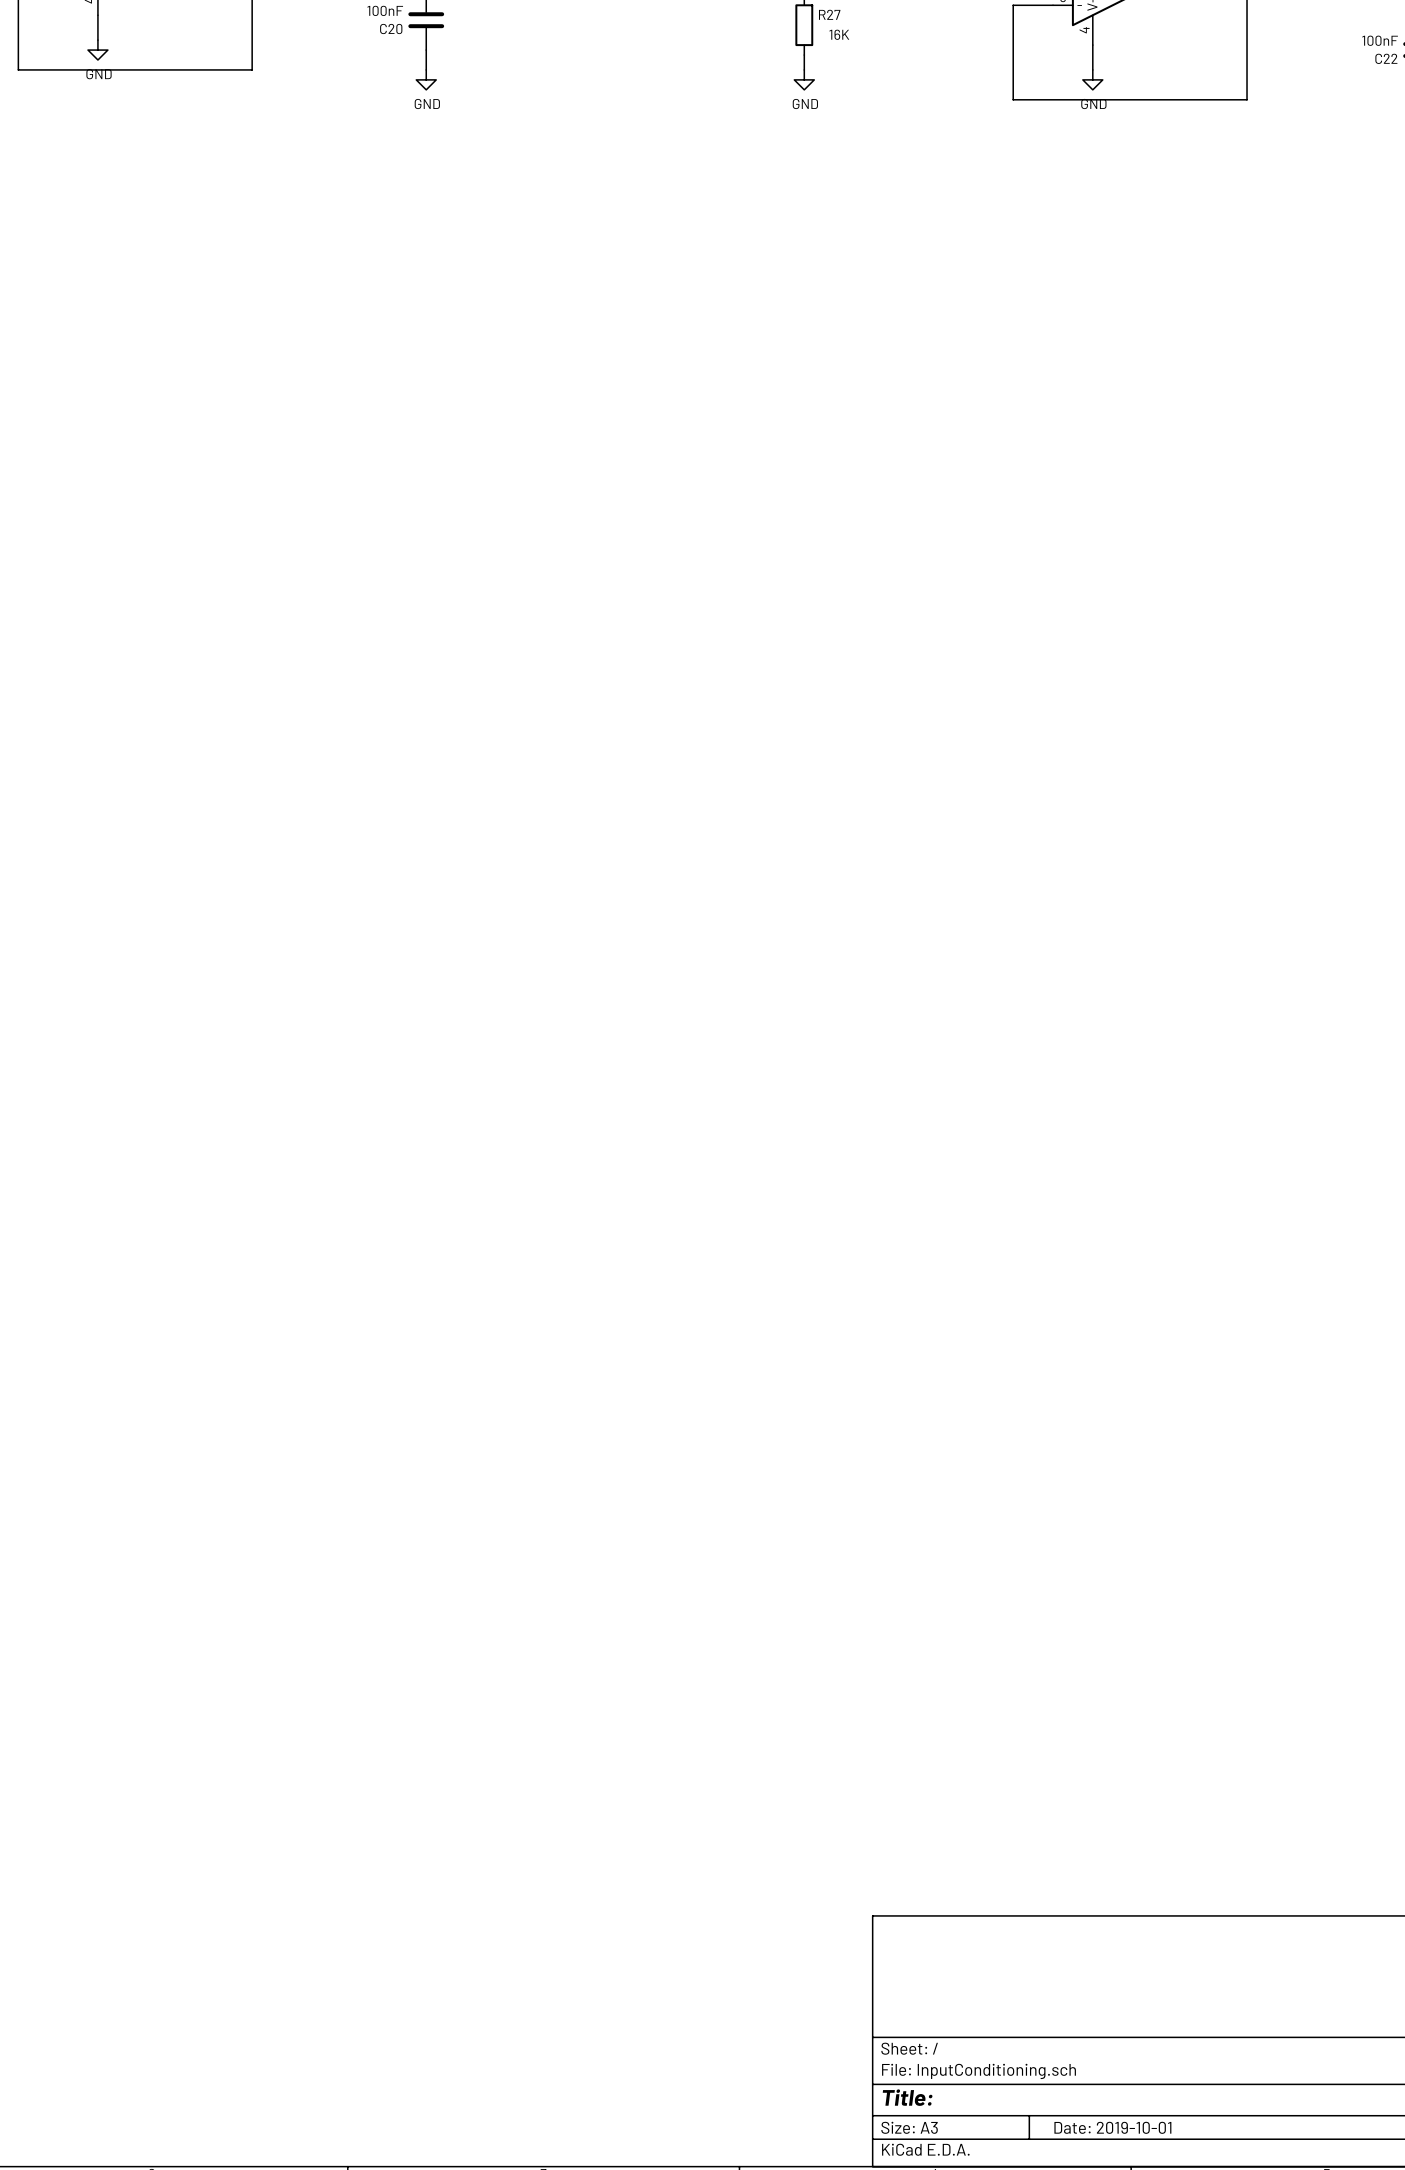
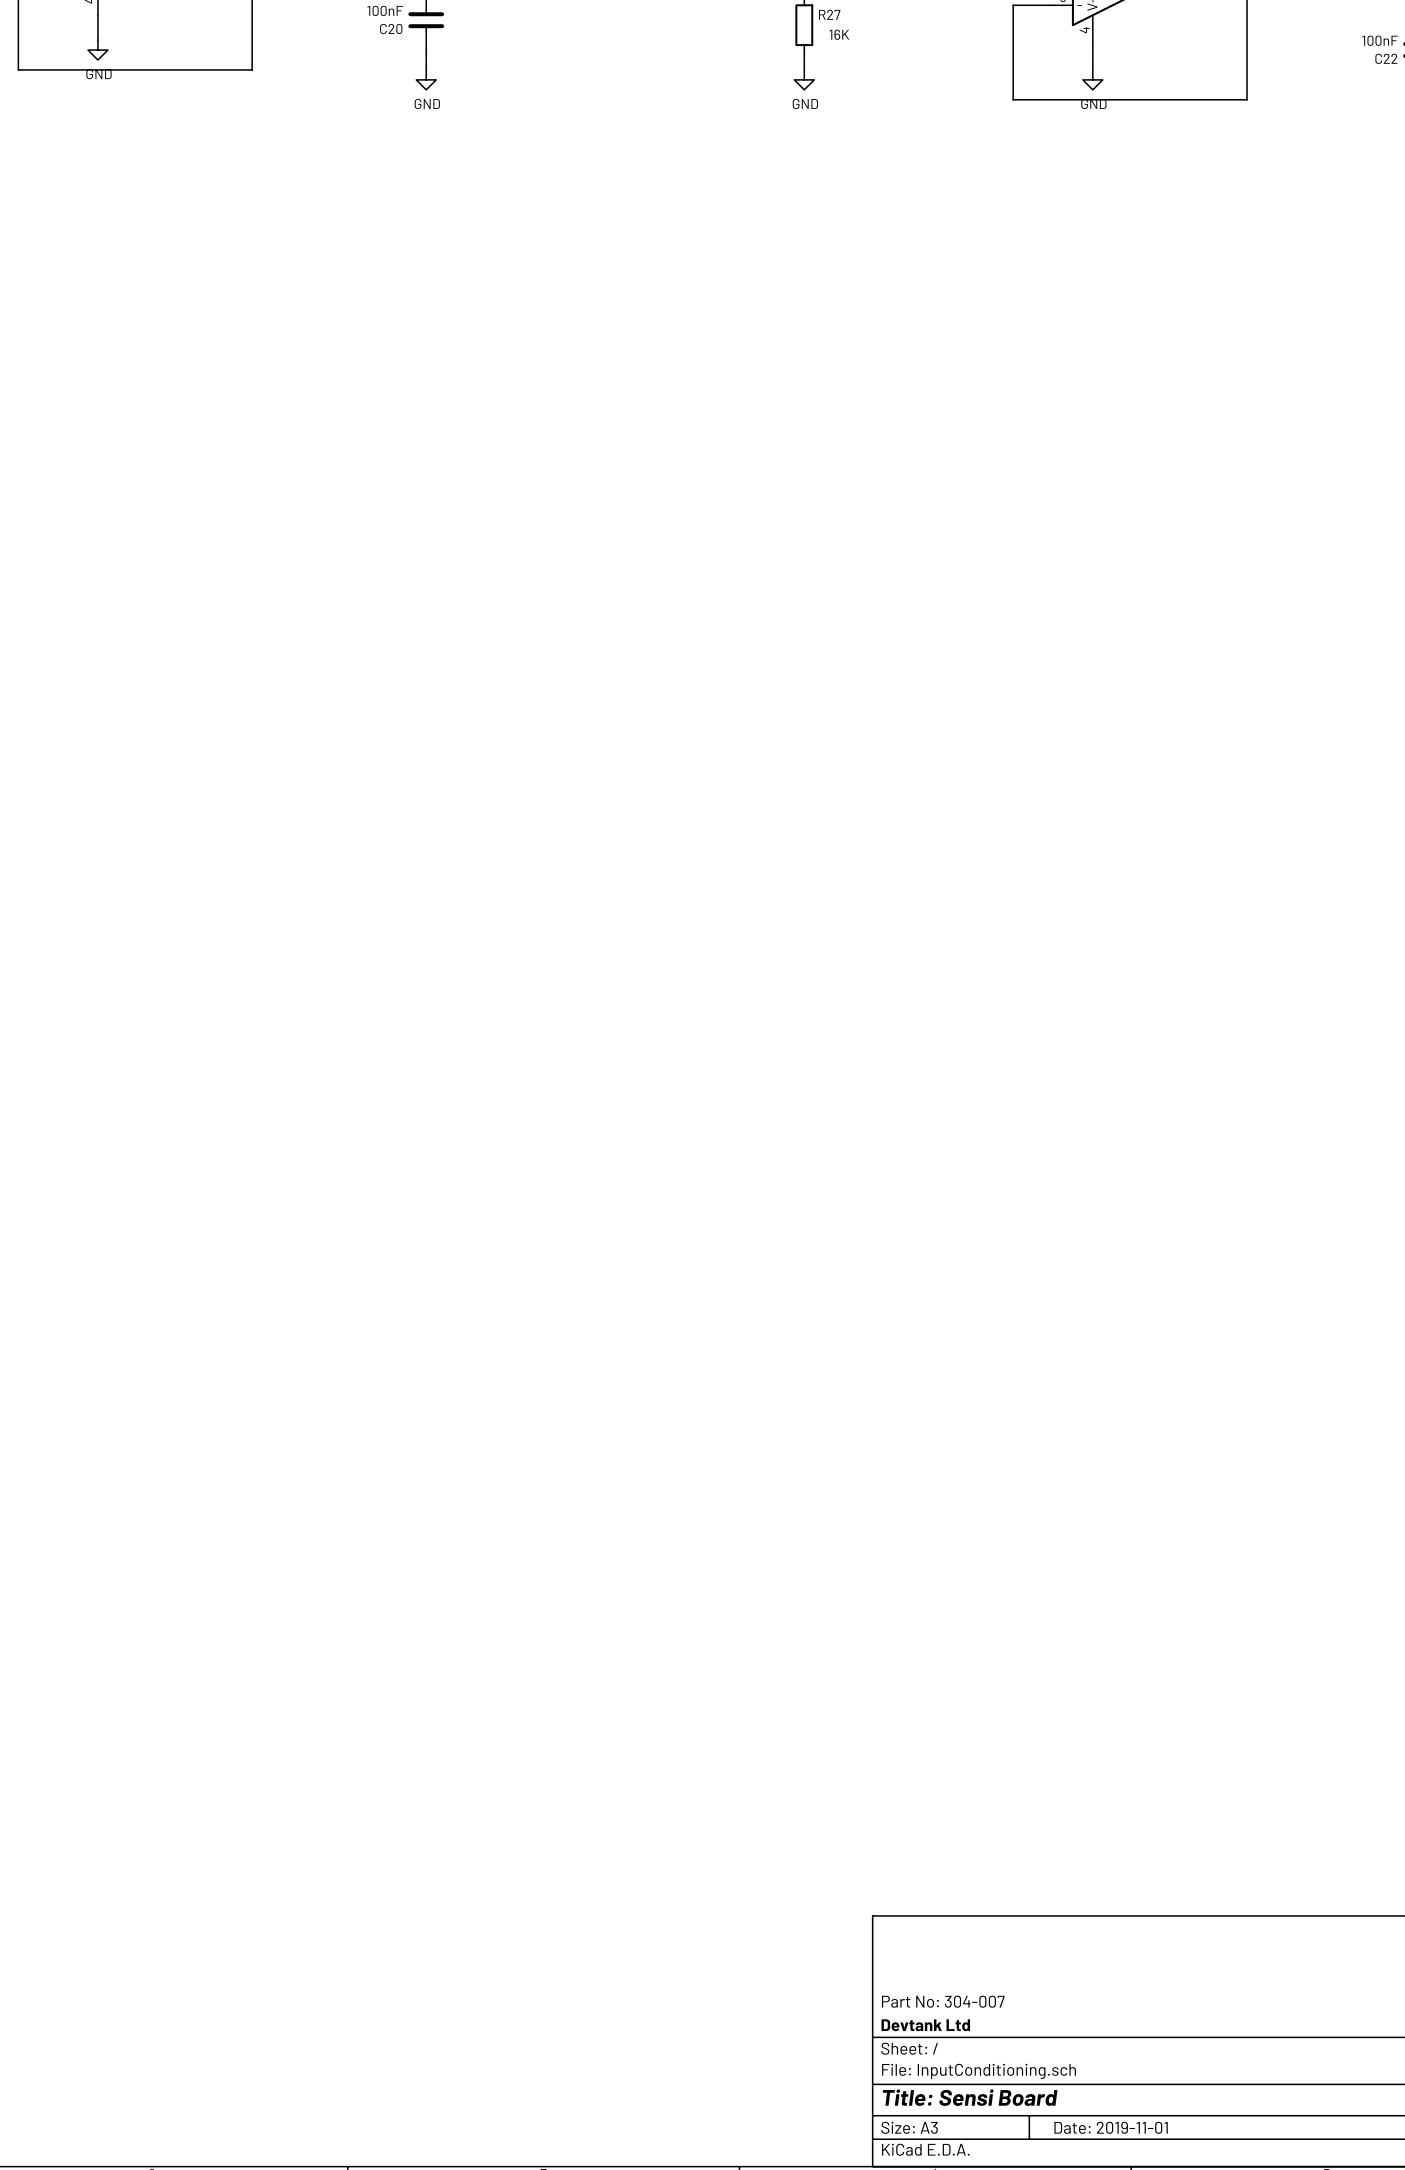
title block: none -> Part No: 304-007 (943, 2001)
title block: none -> Devtank Ltd (925, 2025)
title block: Title: (907, 2097) -> Title: Sensi Board (970, 2097)
title block: Date: 2019-10-01 (1112, 2127) -> Date: 2019-11-01 (1111, 2127)

